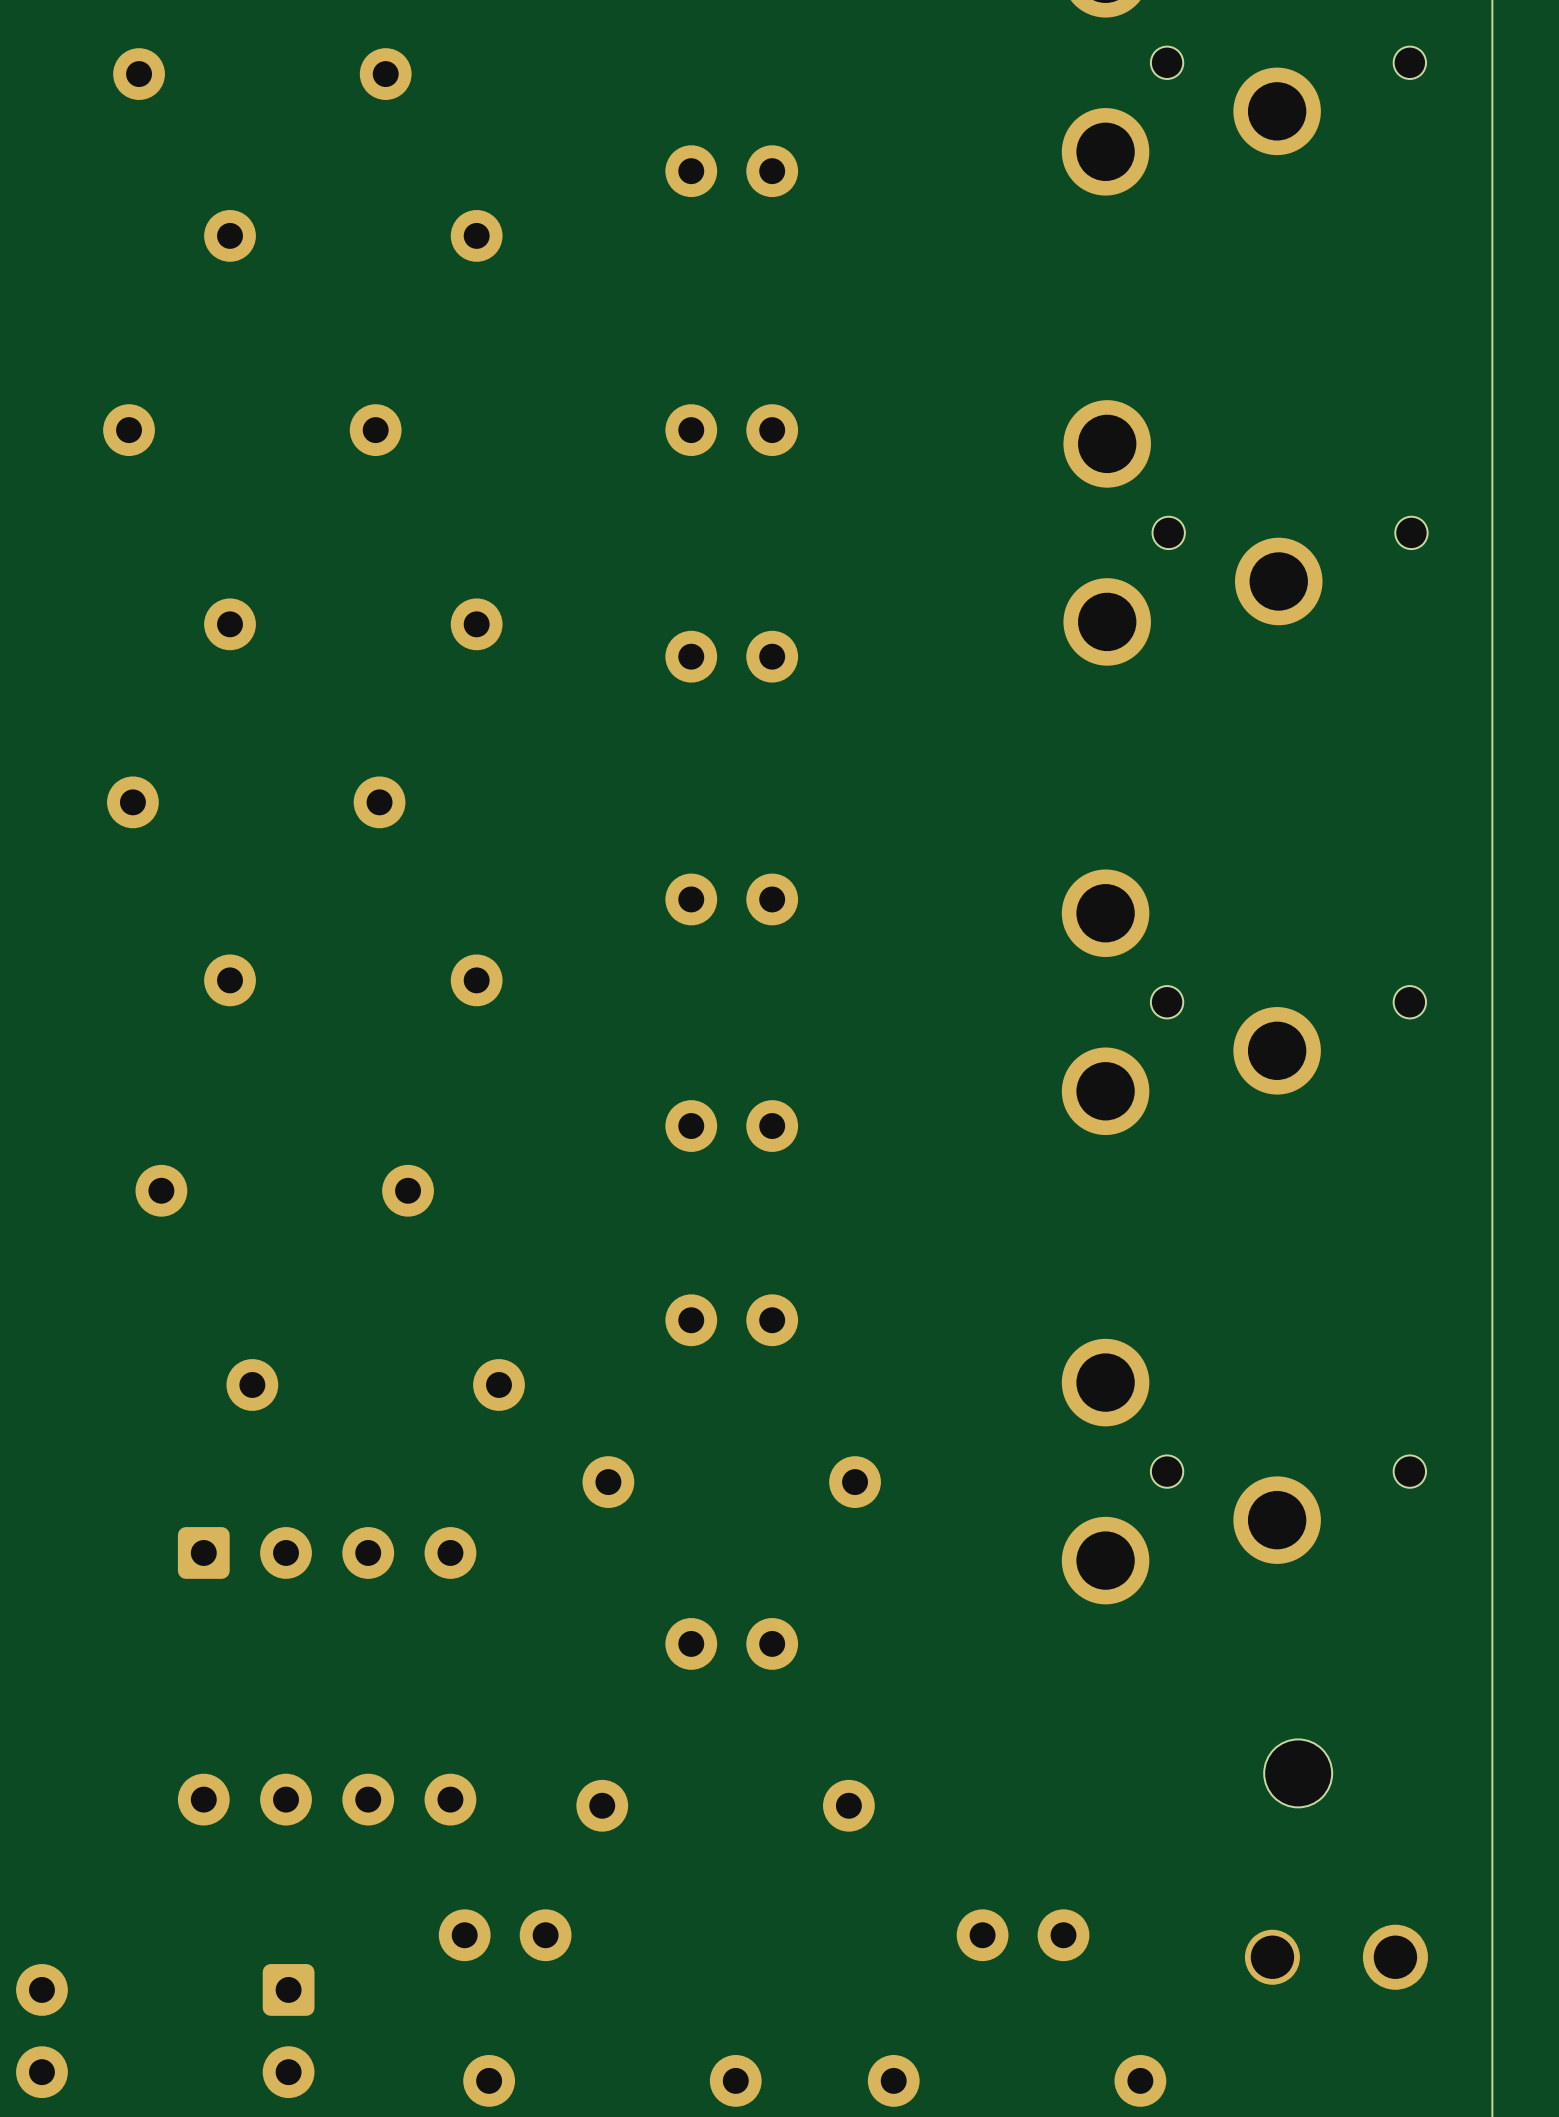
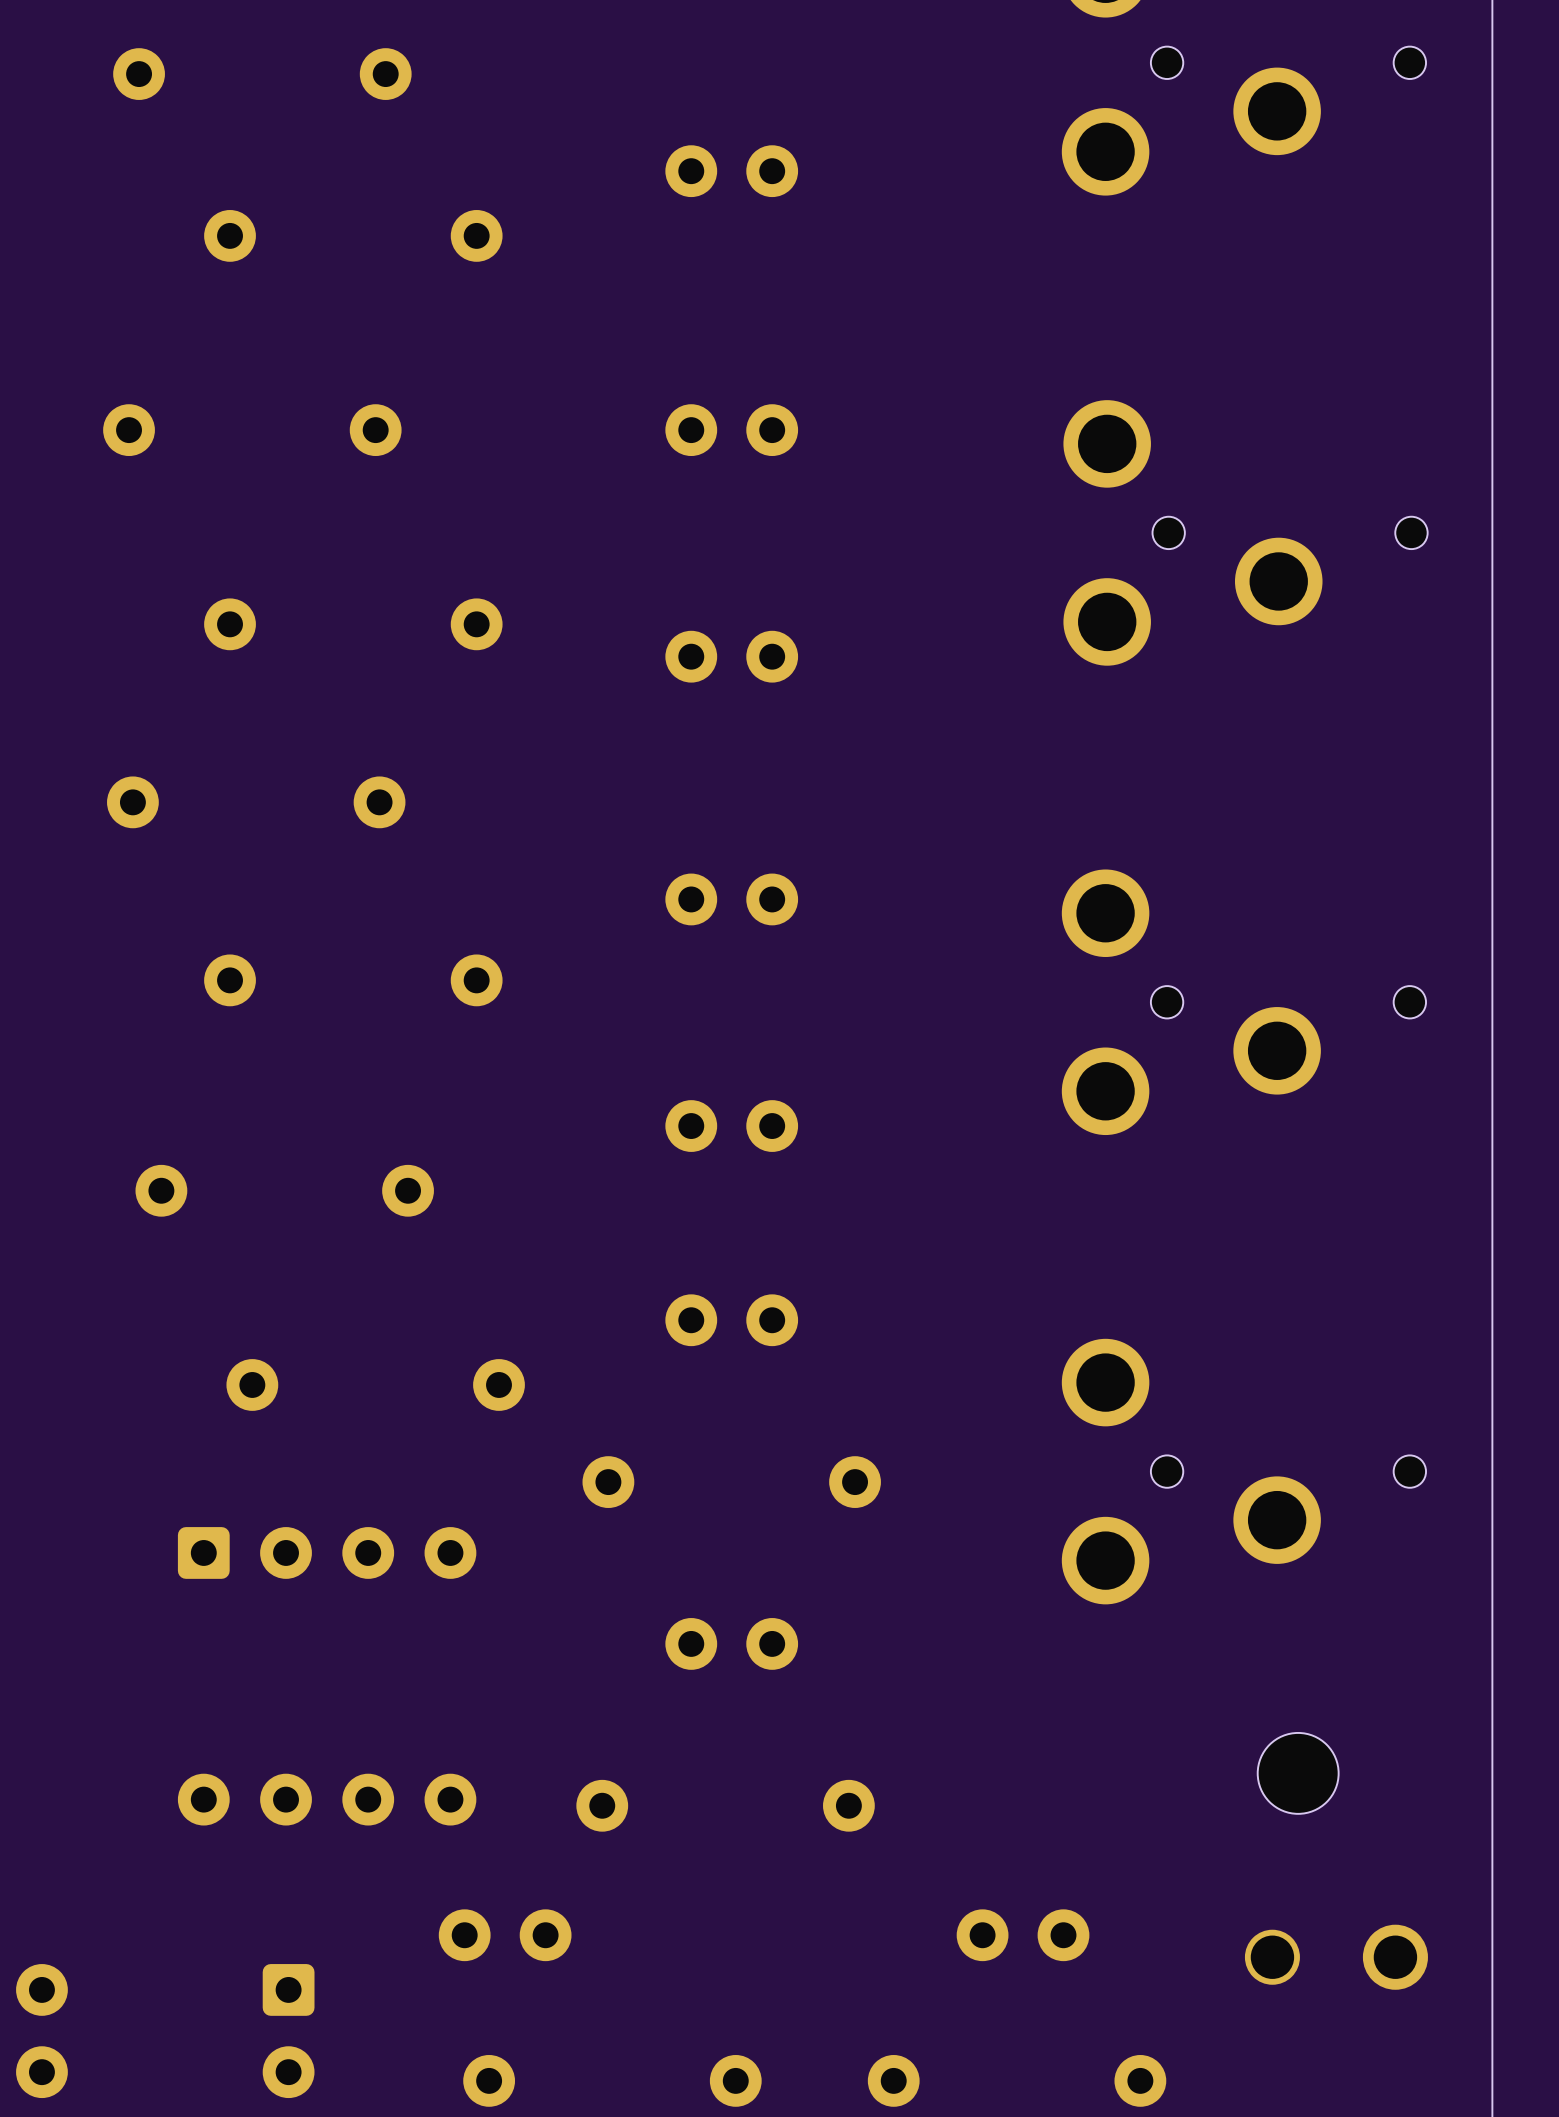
part footprint: [1264, 1739, 1333, 1808] -> [1257, 1732, 1339, 1814]

